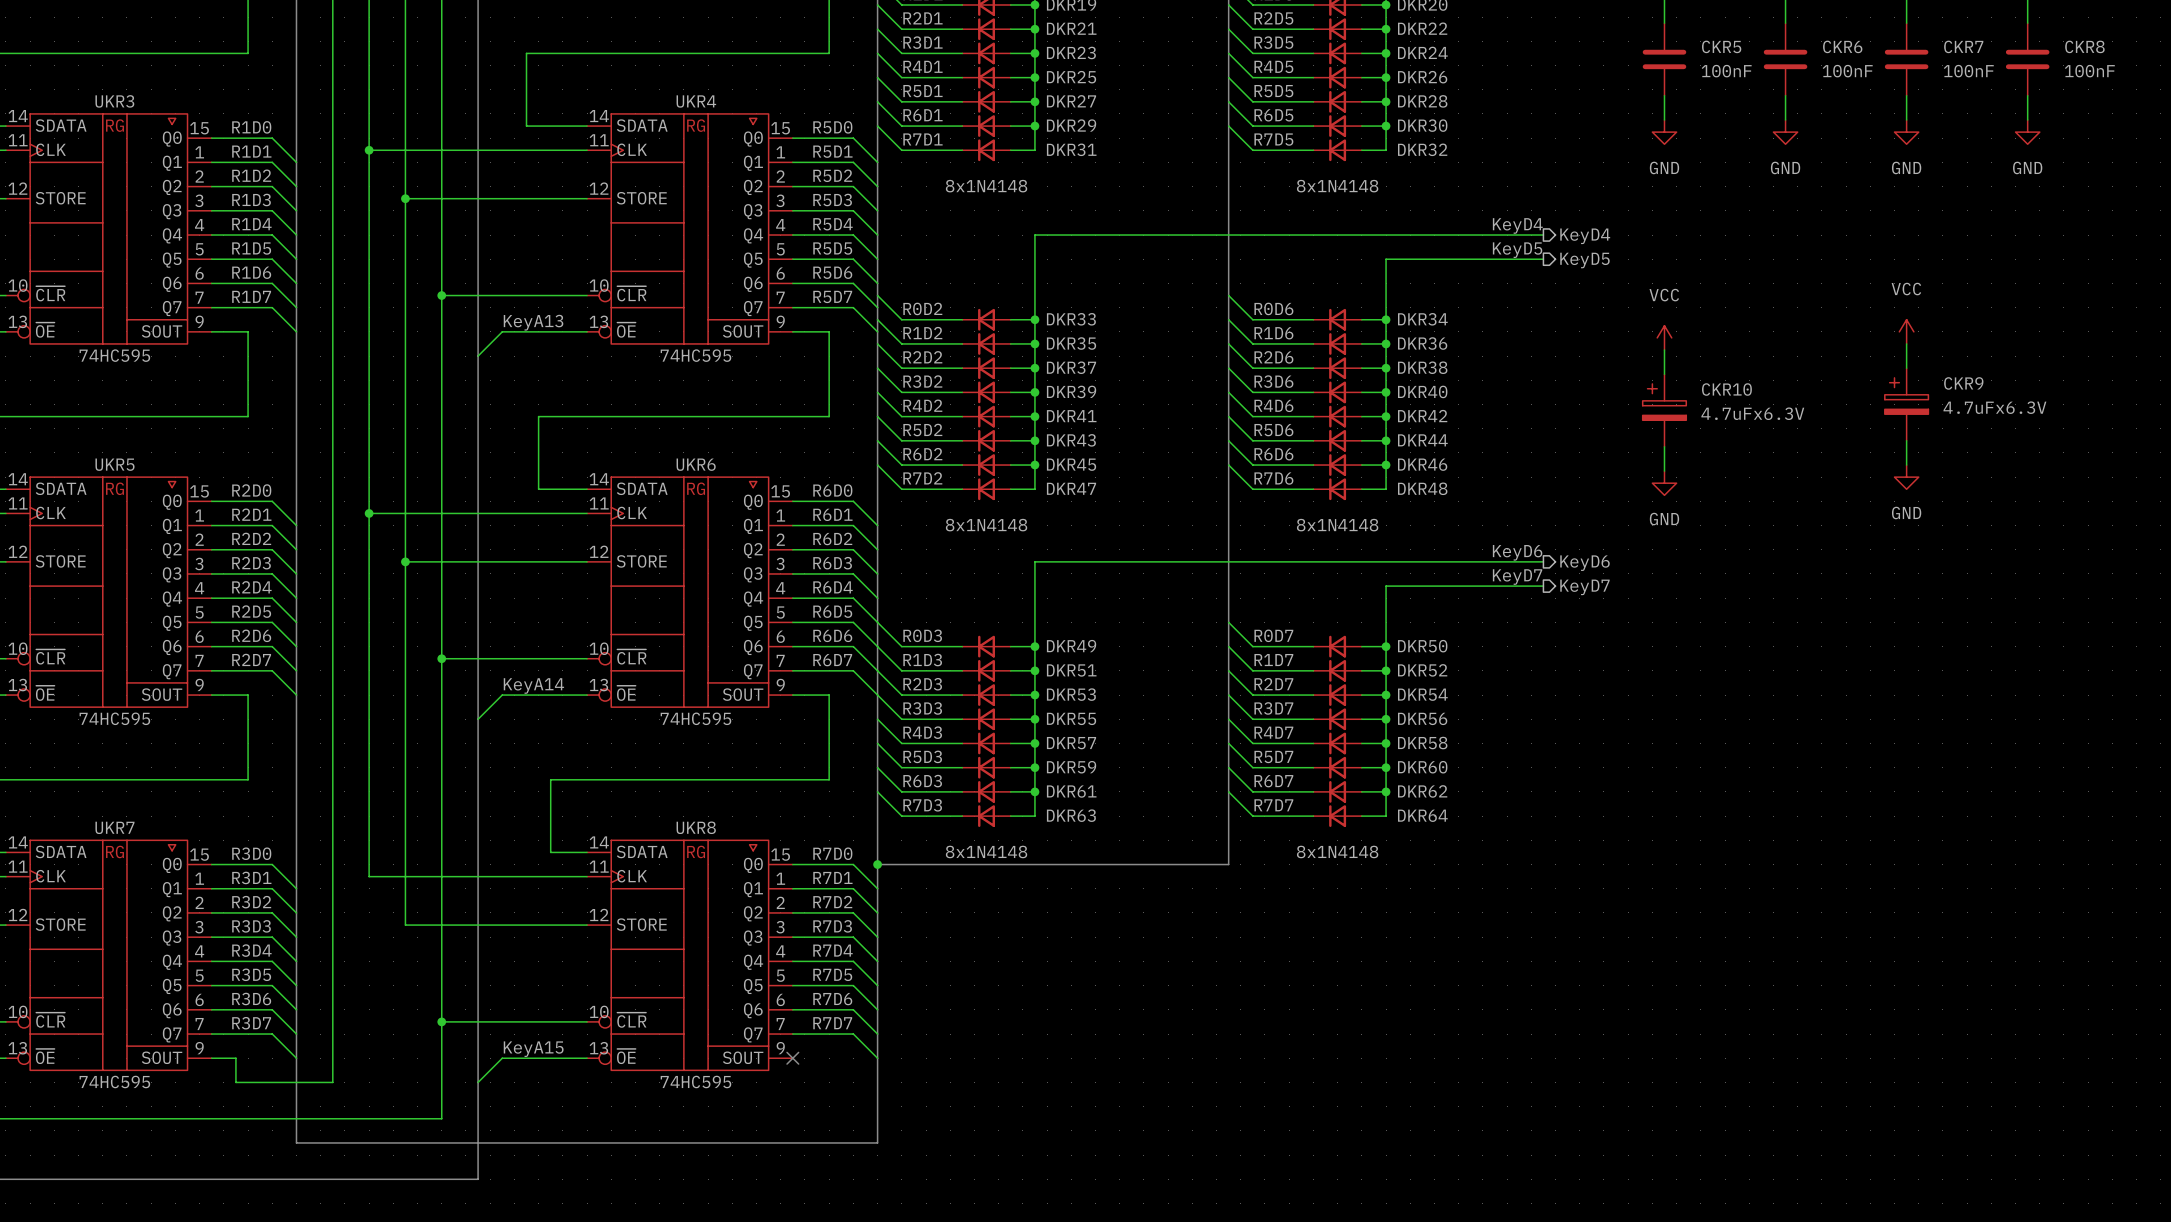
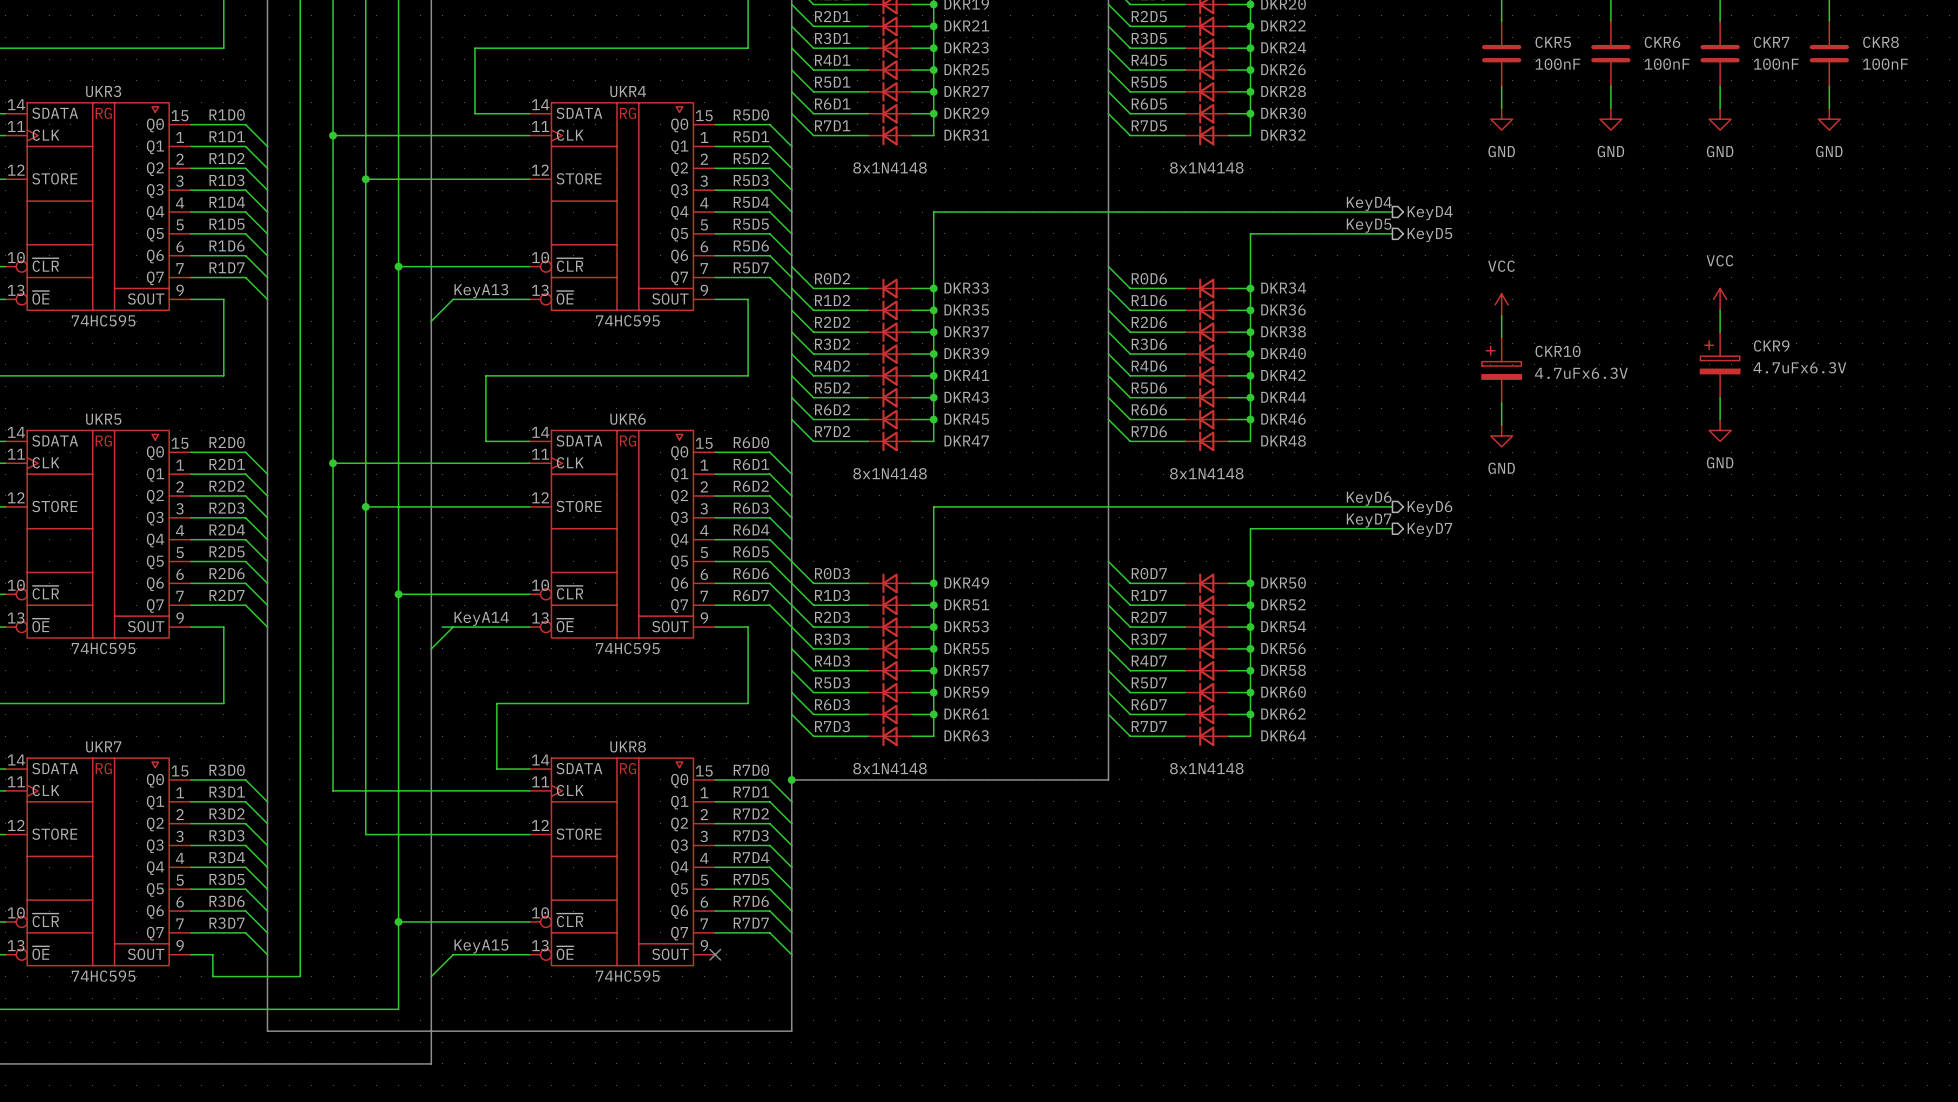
wire: none -> (442, 627) (453, 627)

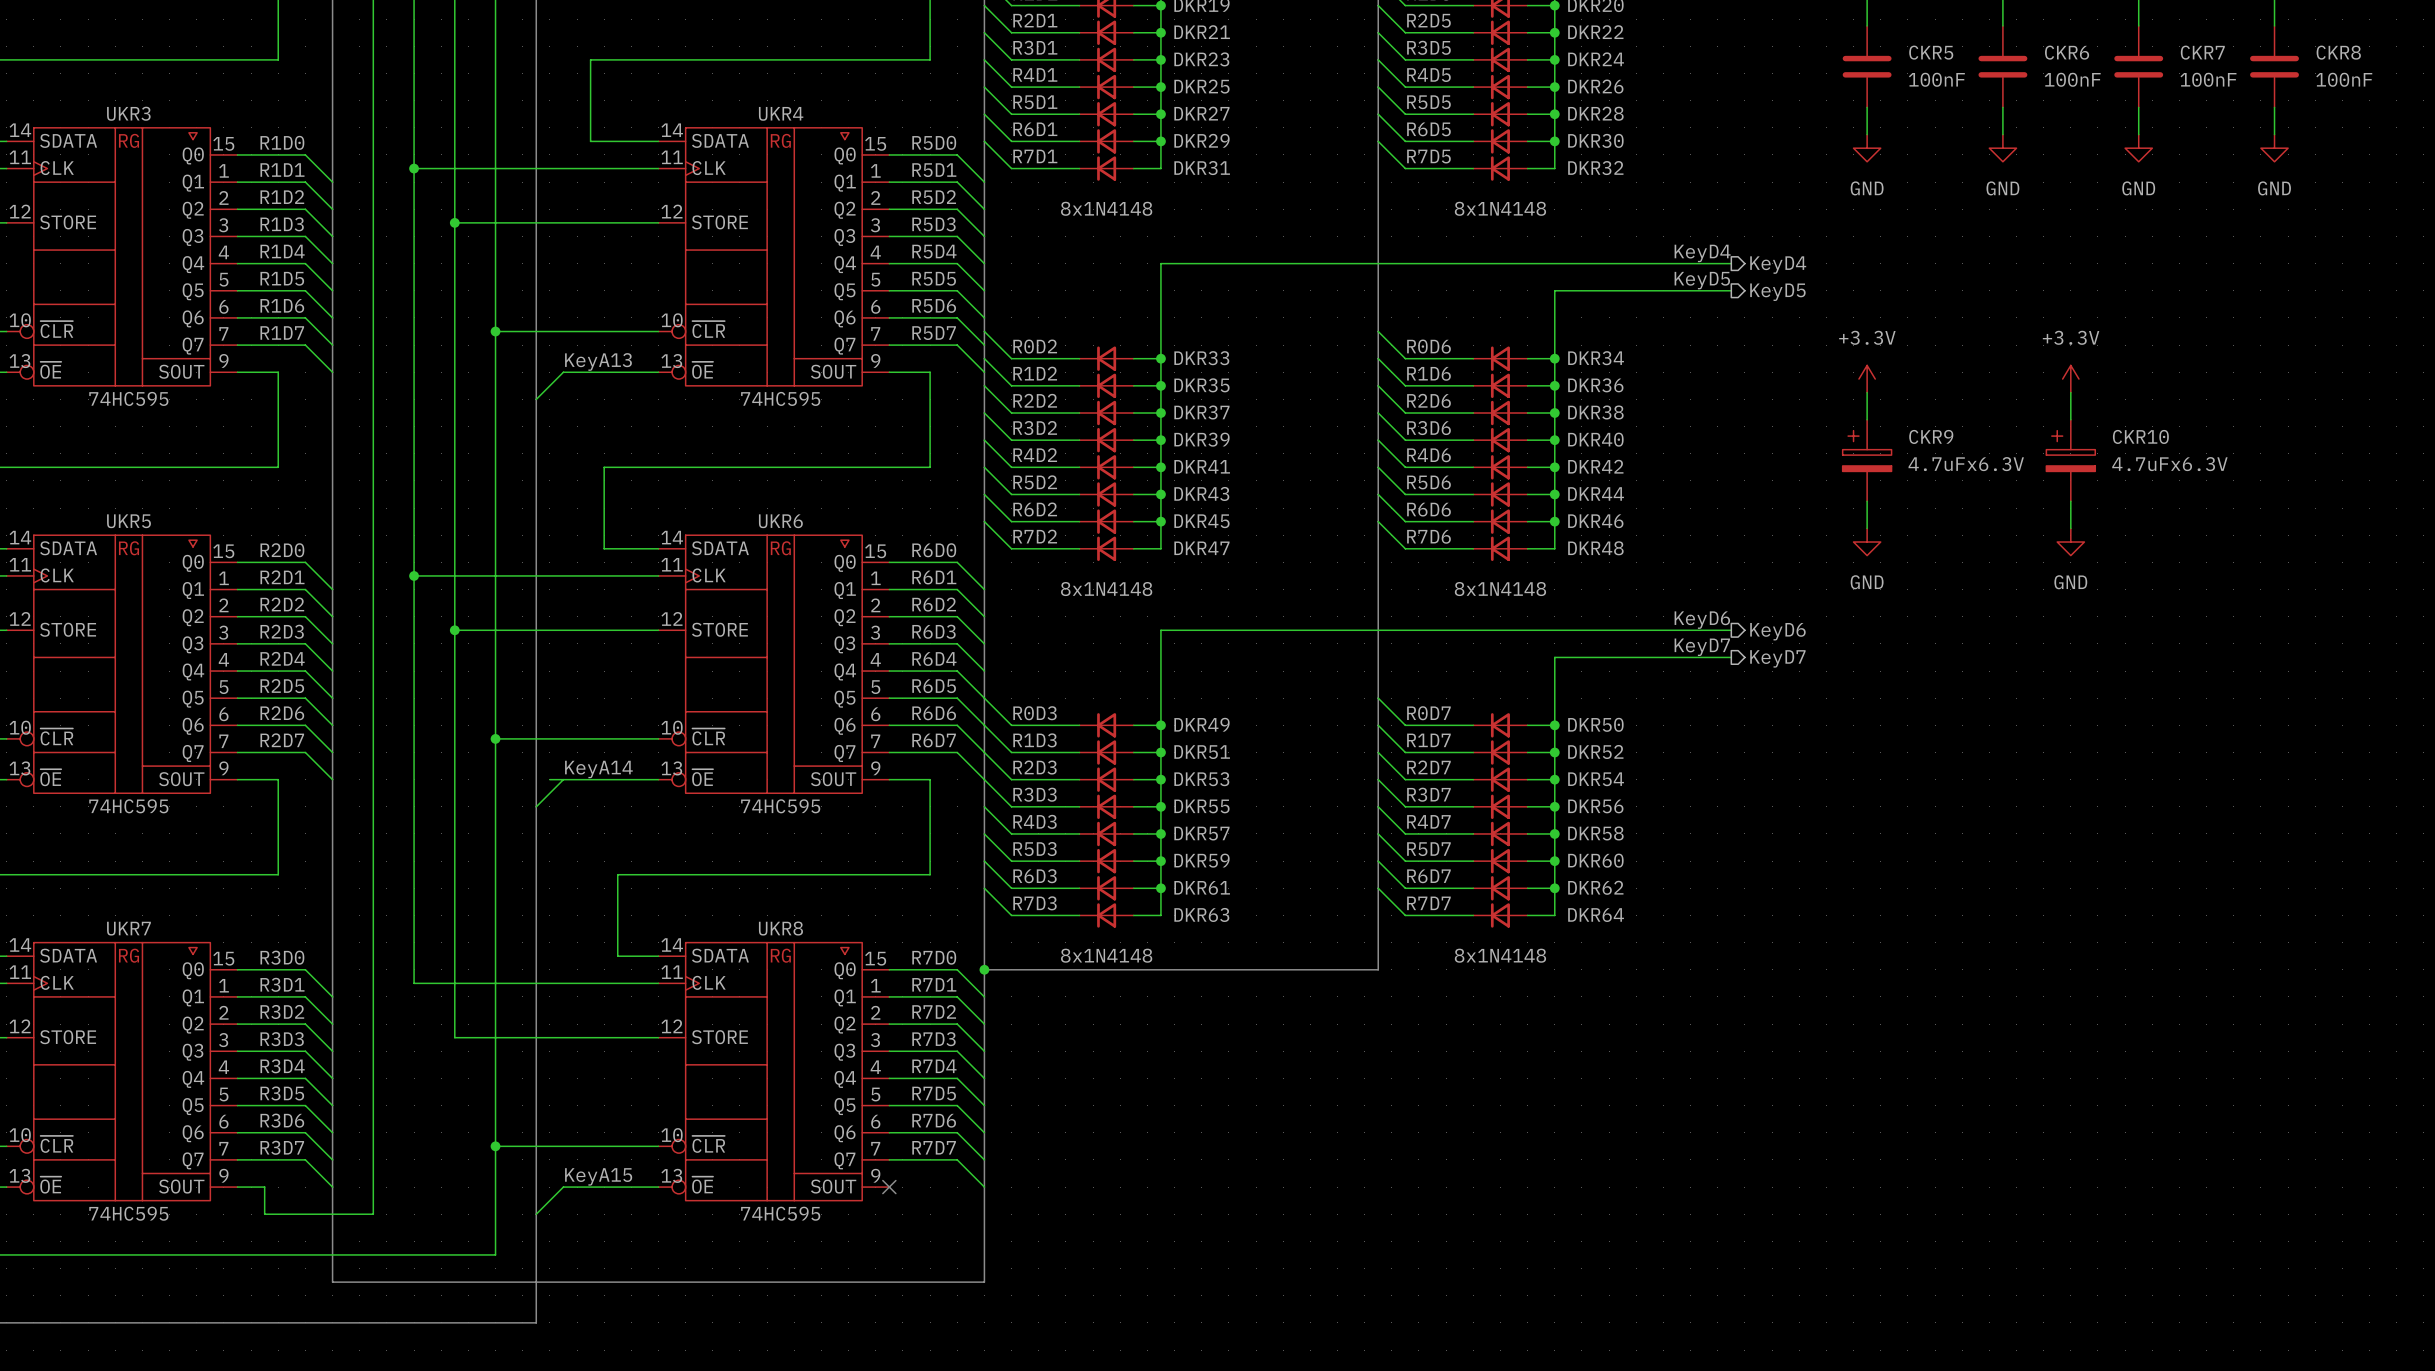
power symbol: VCC (1720, 299) -> none
power symbol: VCC (1501, 304) -> +3.3V (1867, 379)
power symbol: none -> +3.3V (2070, 379)
wire: (1720, 310) (1720, 332) -> (2070, 392) (2070, 419)
CKR10 name: CKR10 (1558, 351) -> CKR9 (1931, 436)
CKR9: 4.7uFx6.3V (1720, 364) -> none
CKR10: none -> 4.7uFx6.3V (2070, 460)
wire: (1720, 397) (1720, 419) -> (2070, 501) (2070, 528)
power symbol position: GND (1720, 430) -> GND (2070, 542)

